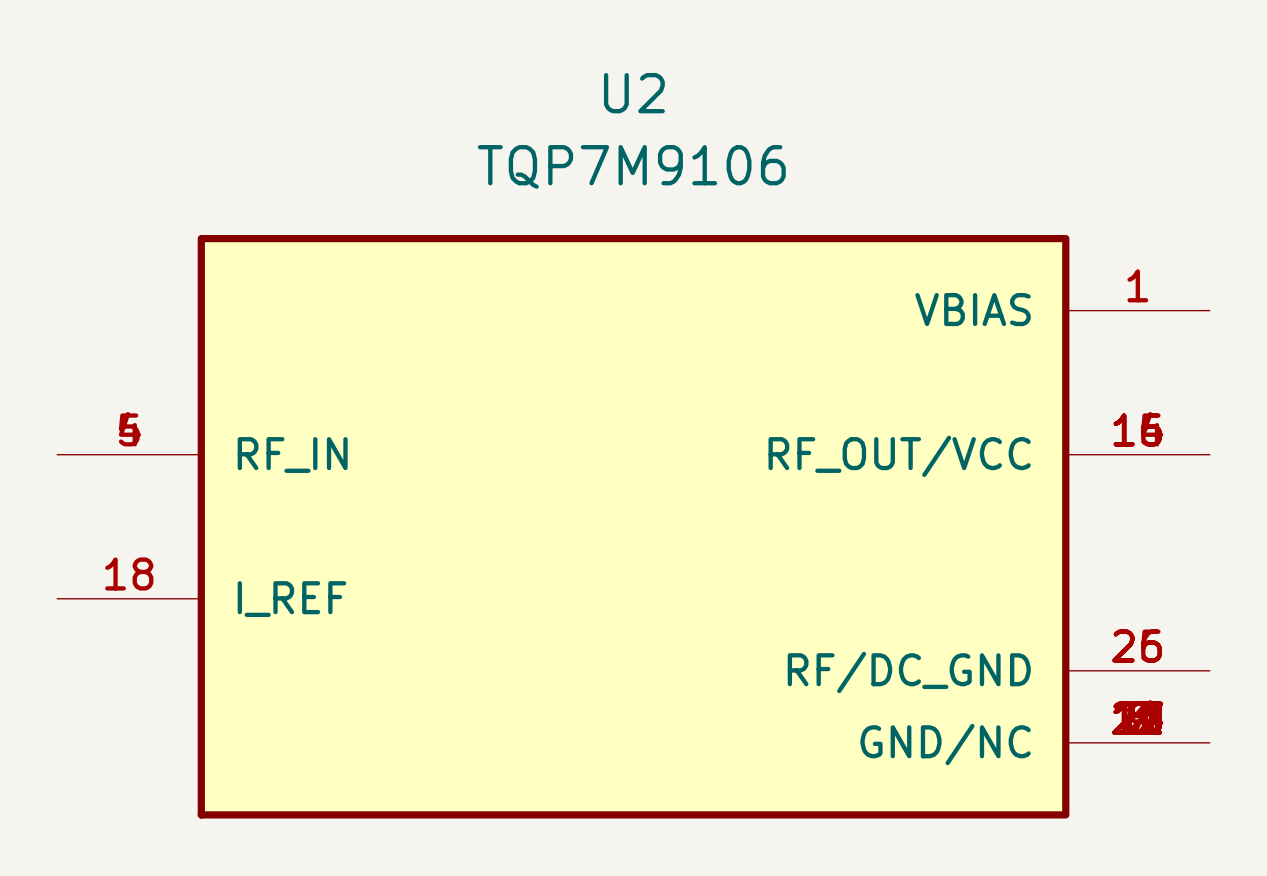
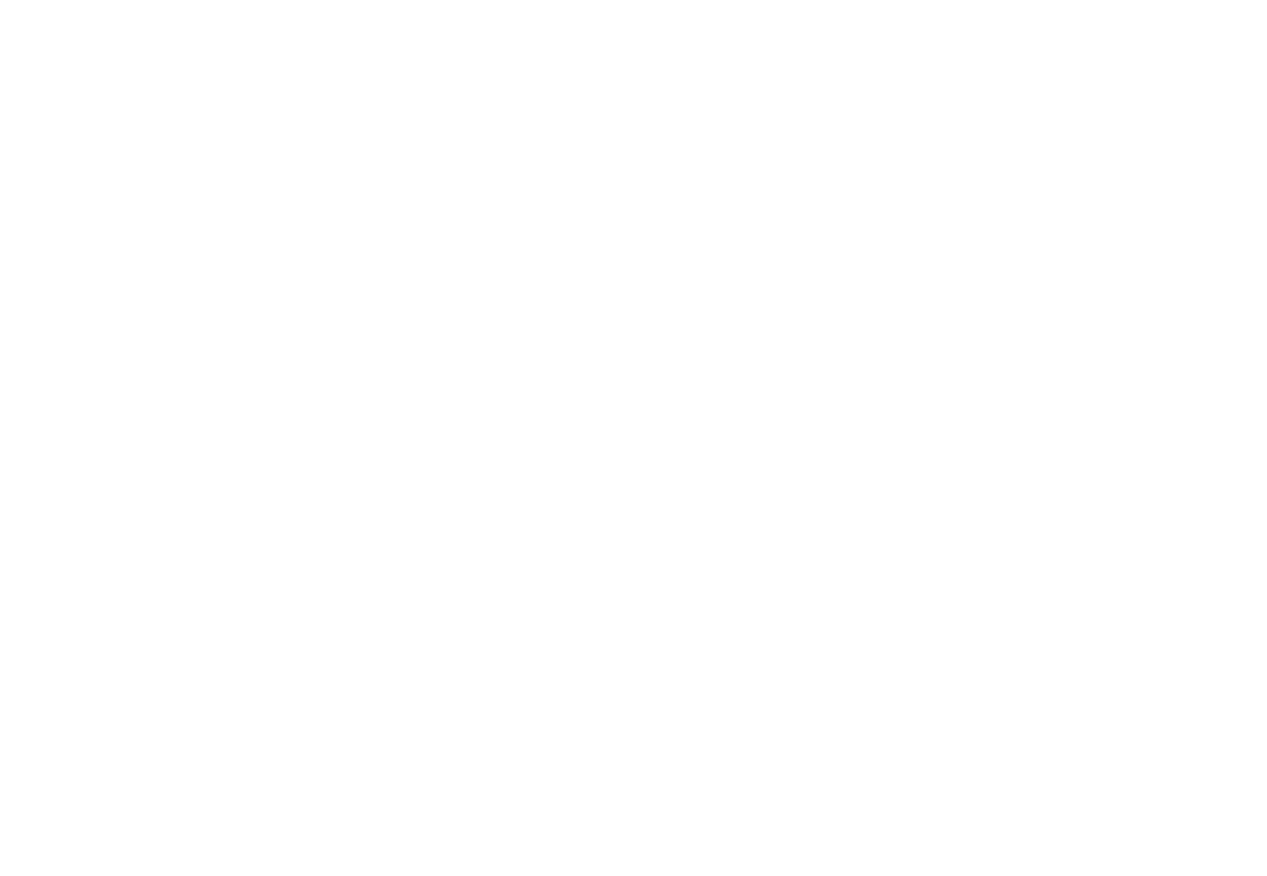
U2: TQP7M9106 (633, 526) -> none

